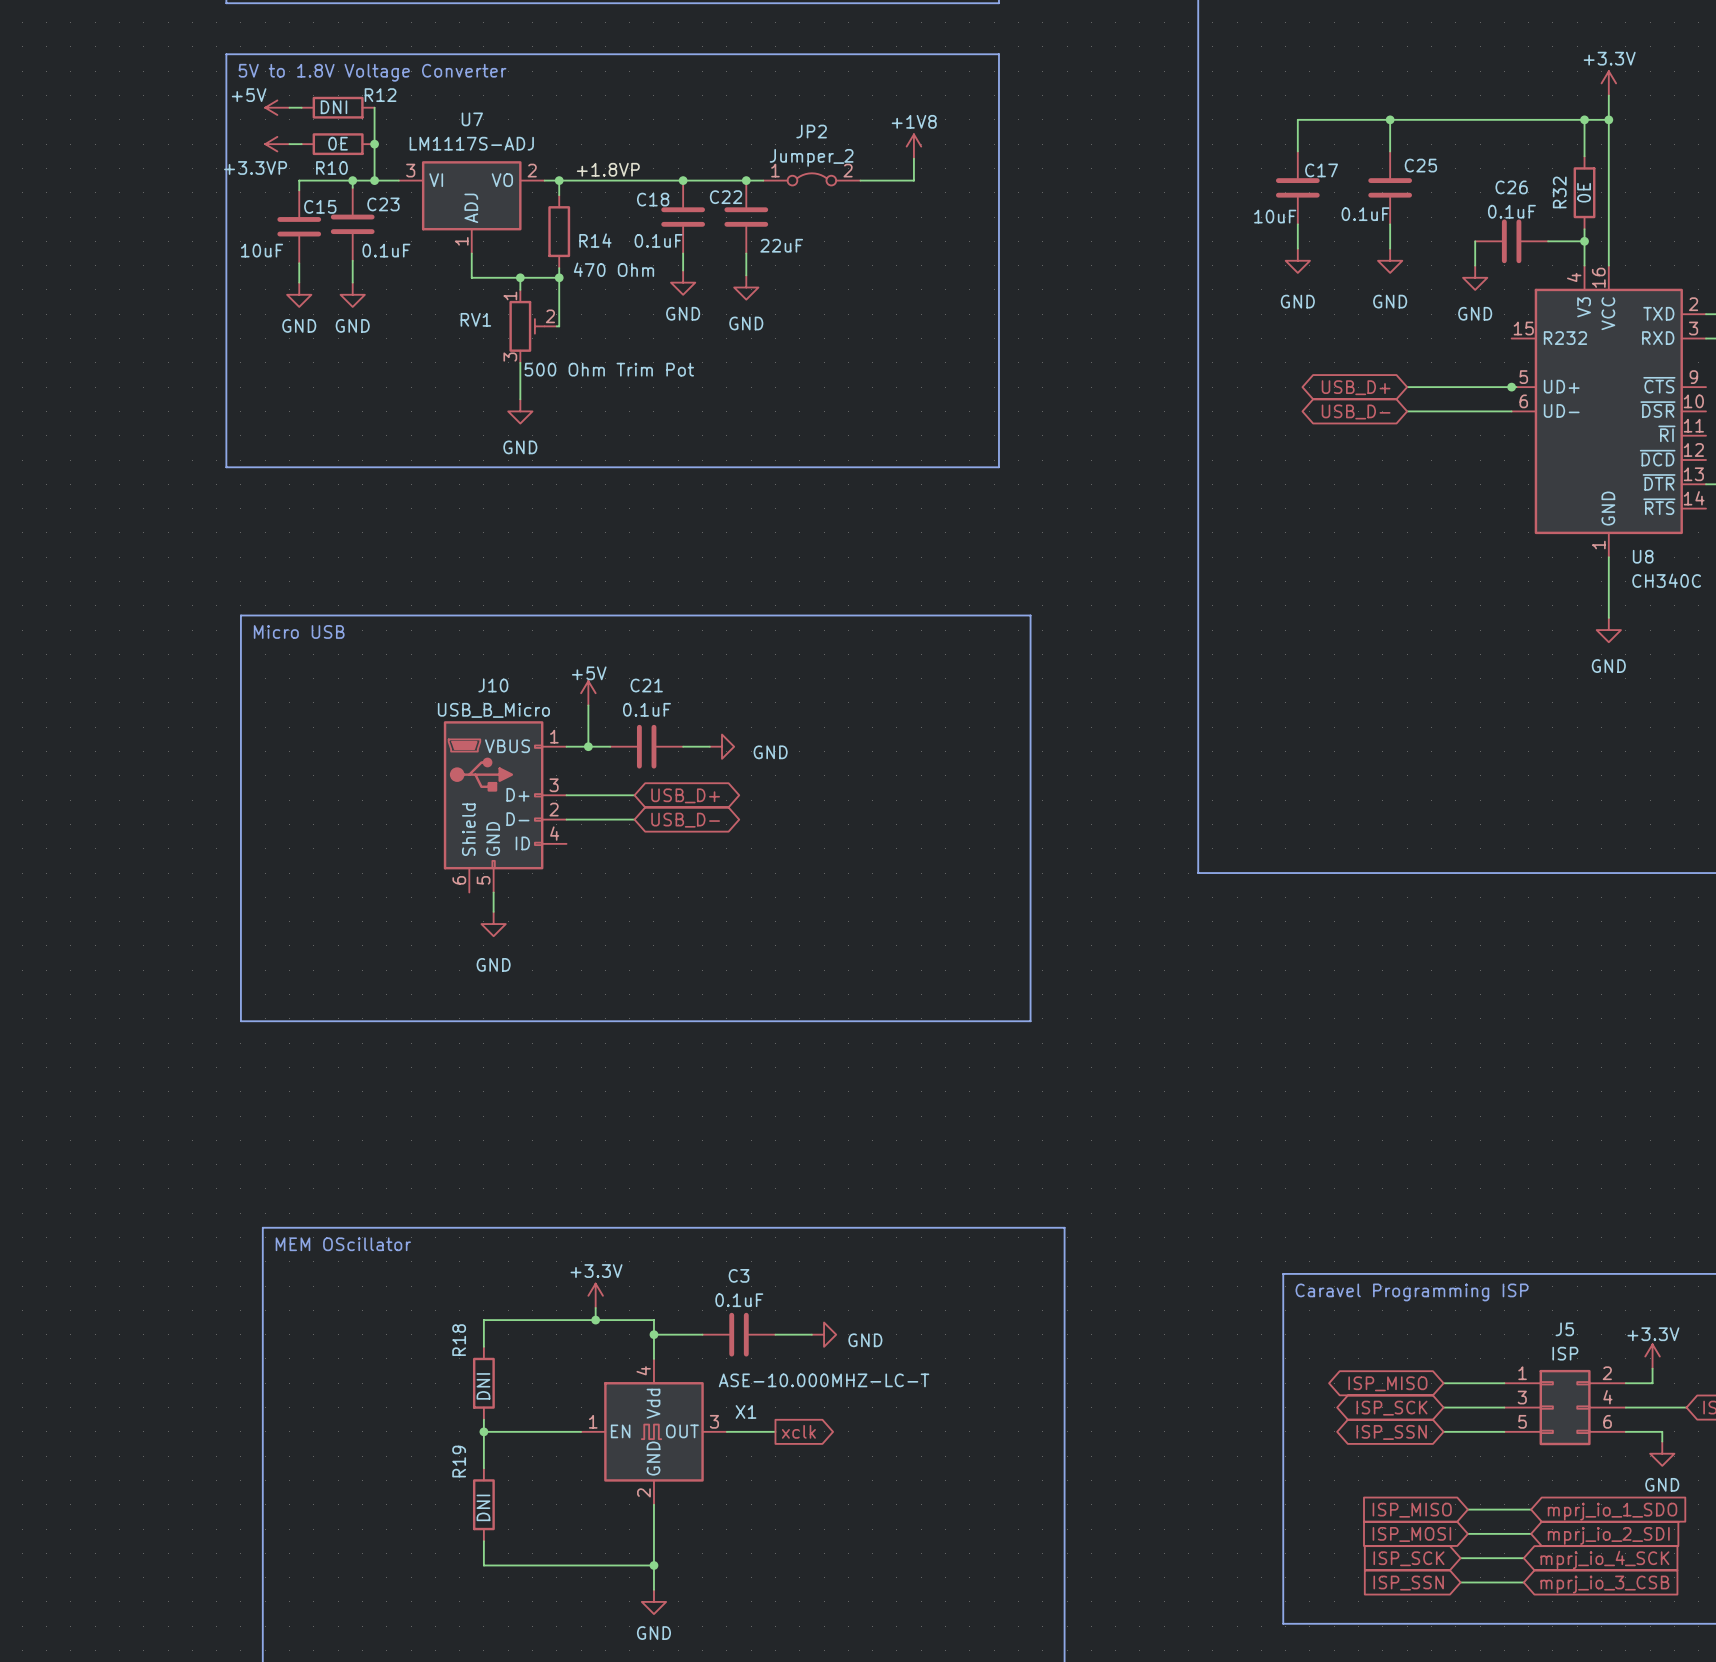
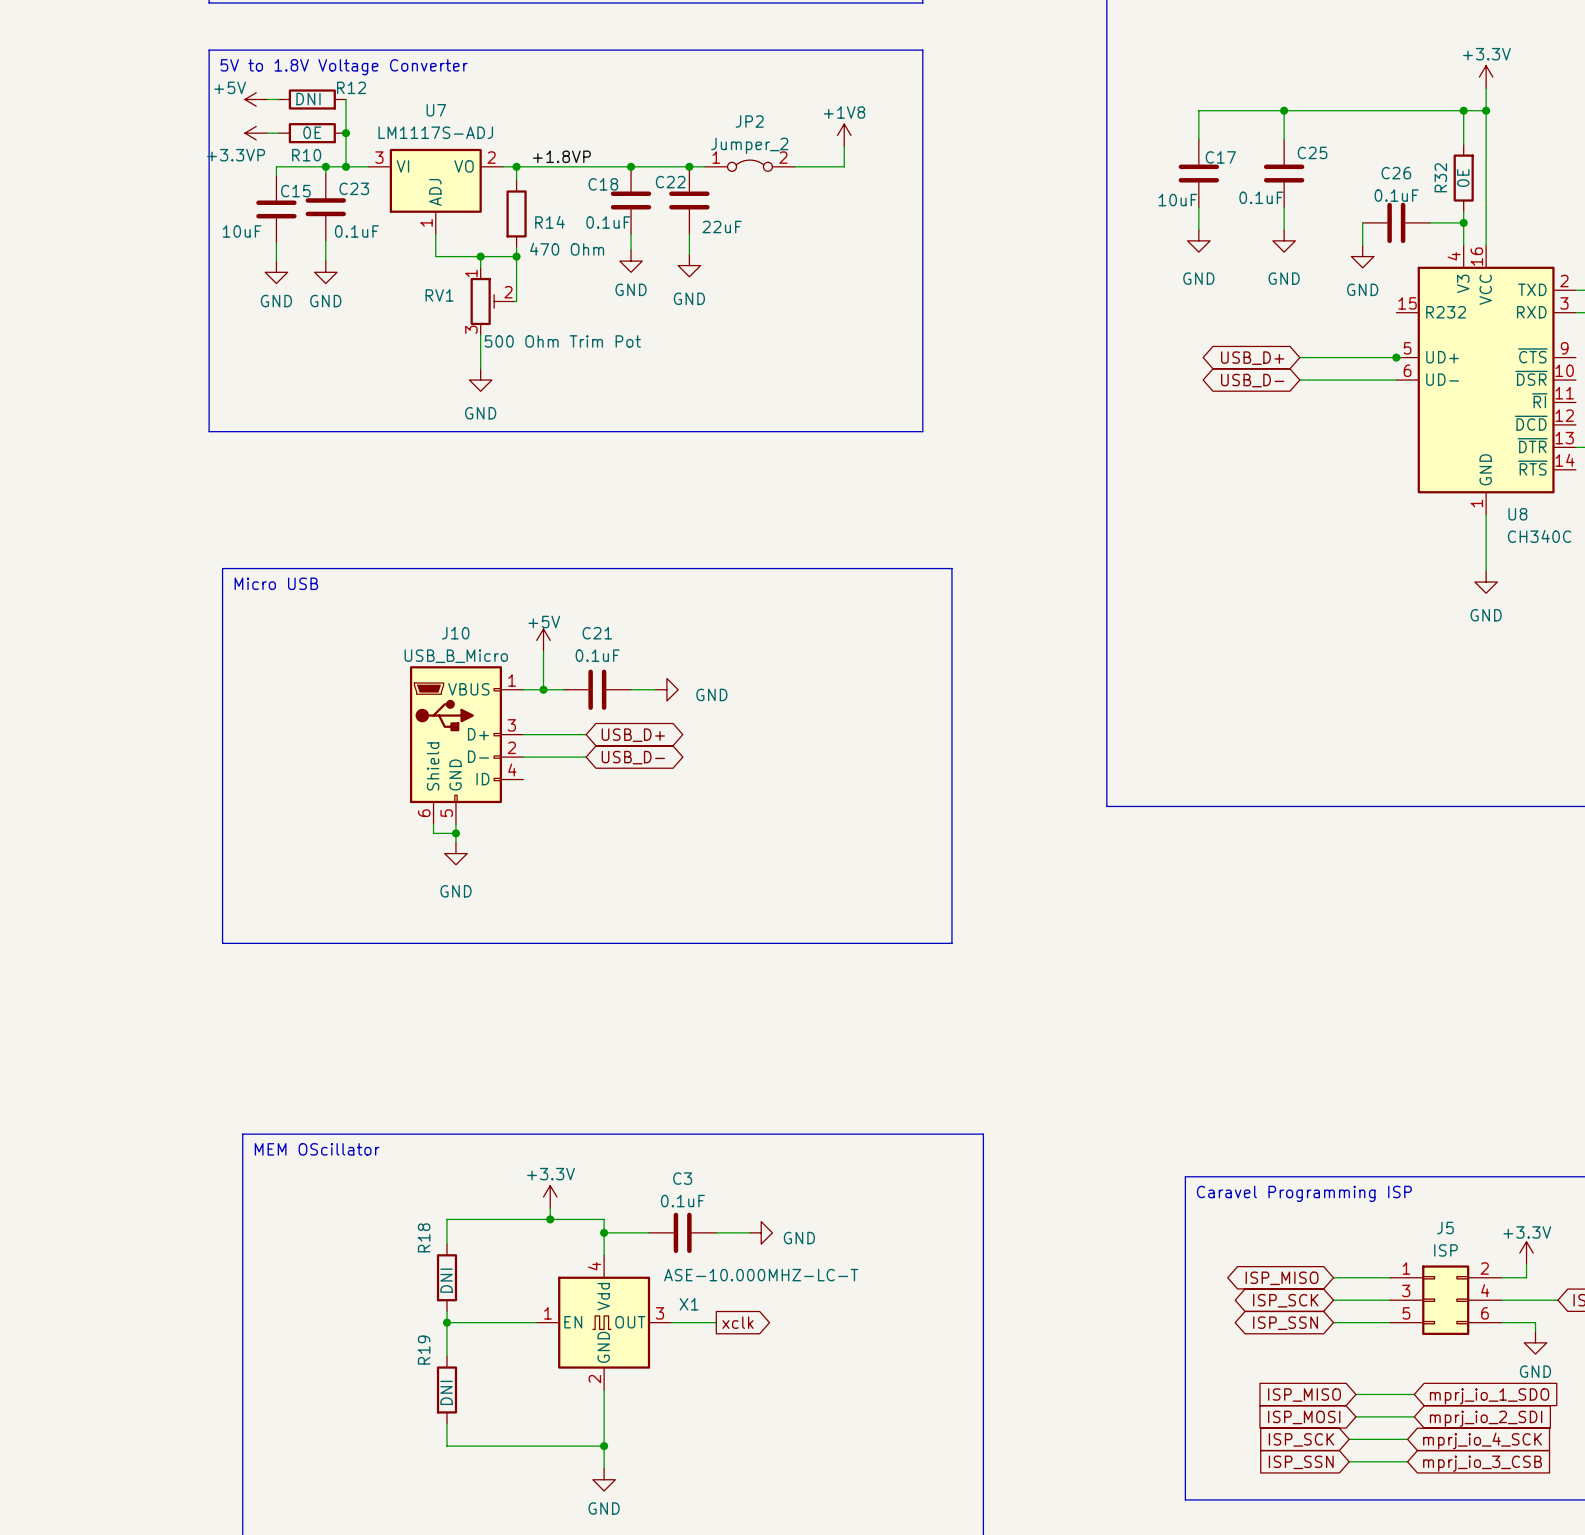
wire: none -> (433, 824) (433, 833) (455, 833)
junction: none -> (455, 833)

